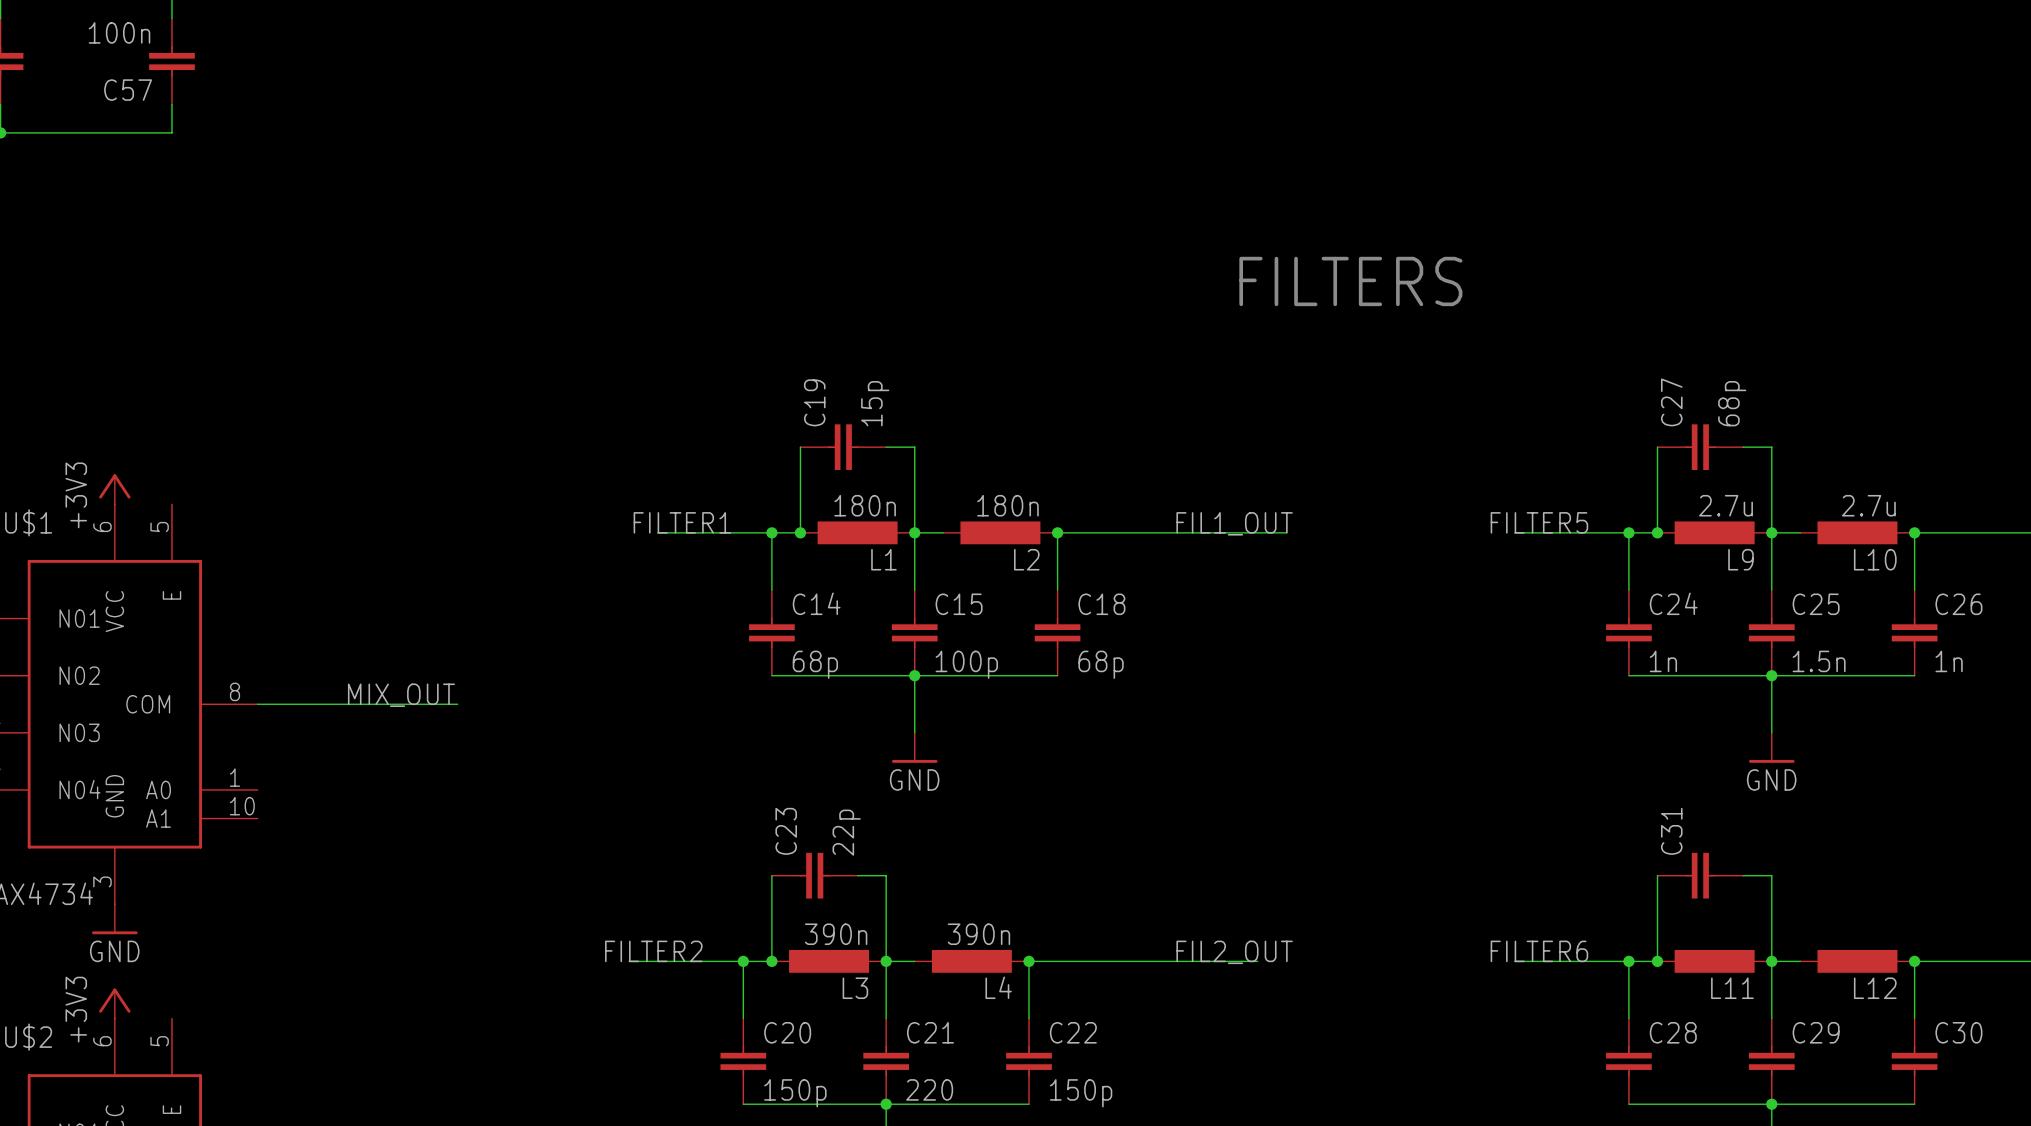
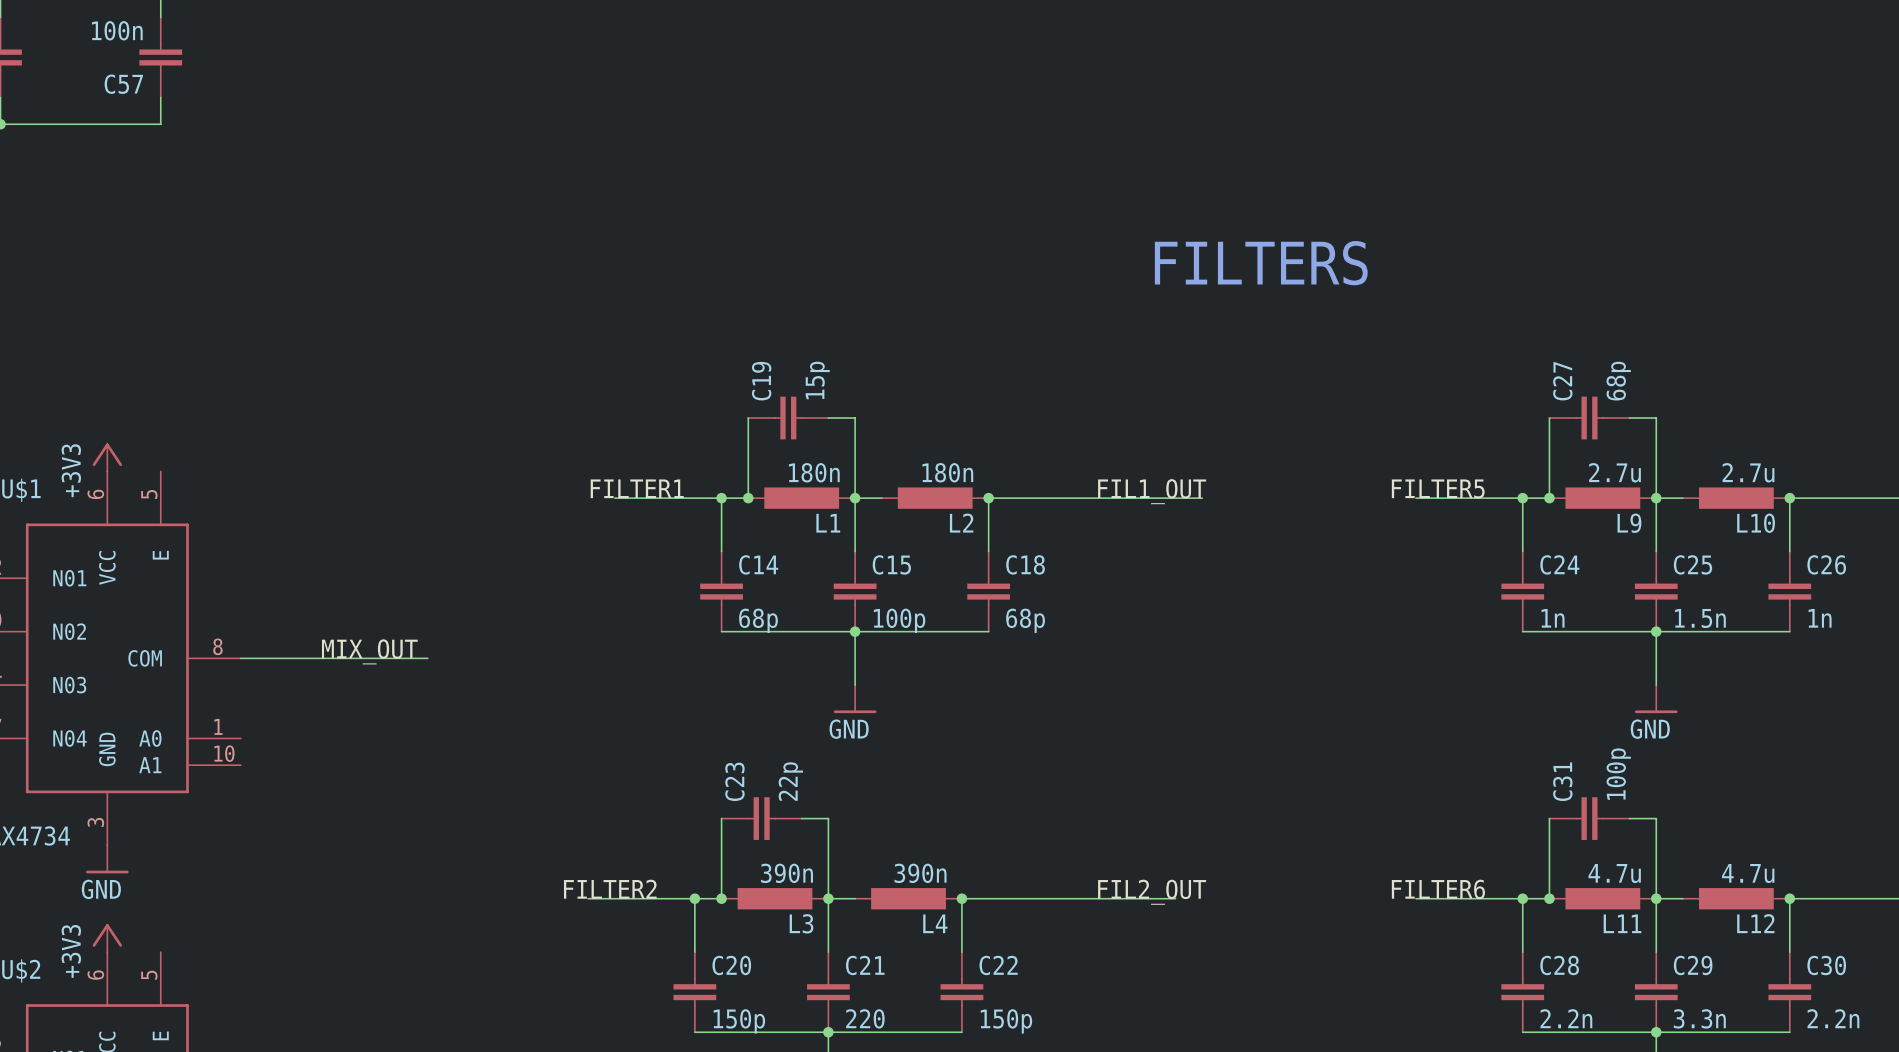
C31 value: none -> 100p (1618, 774)
L11 value: none -> 4.7u (1614, 873)
L12 value: none -> 4.7u (1748, 873)
C28 value: none -> 2.2n (1566, 1018)
C29 value: none -> 3.3n (1699, 1018)
C30 value: none -> 2.2n (1833, 1018)

